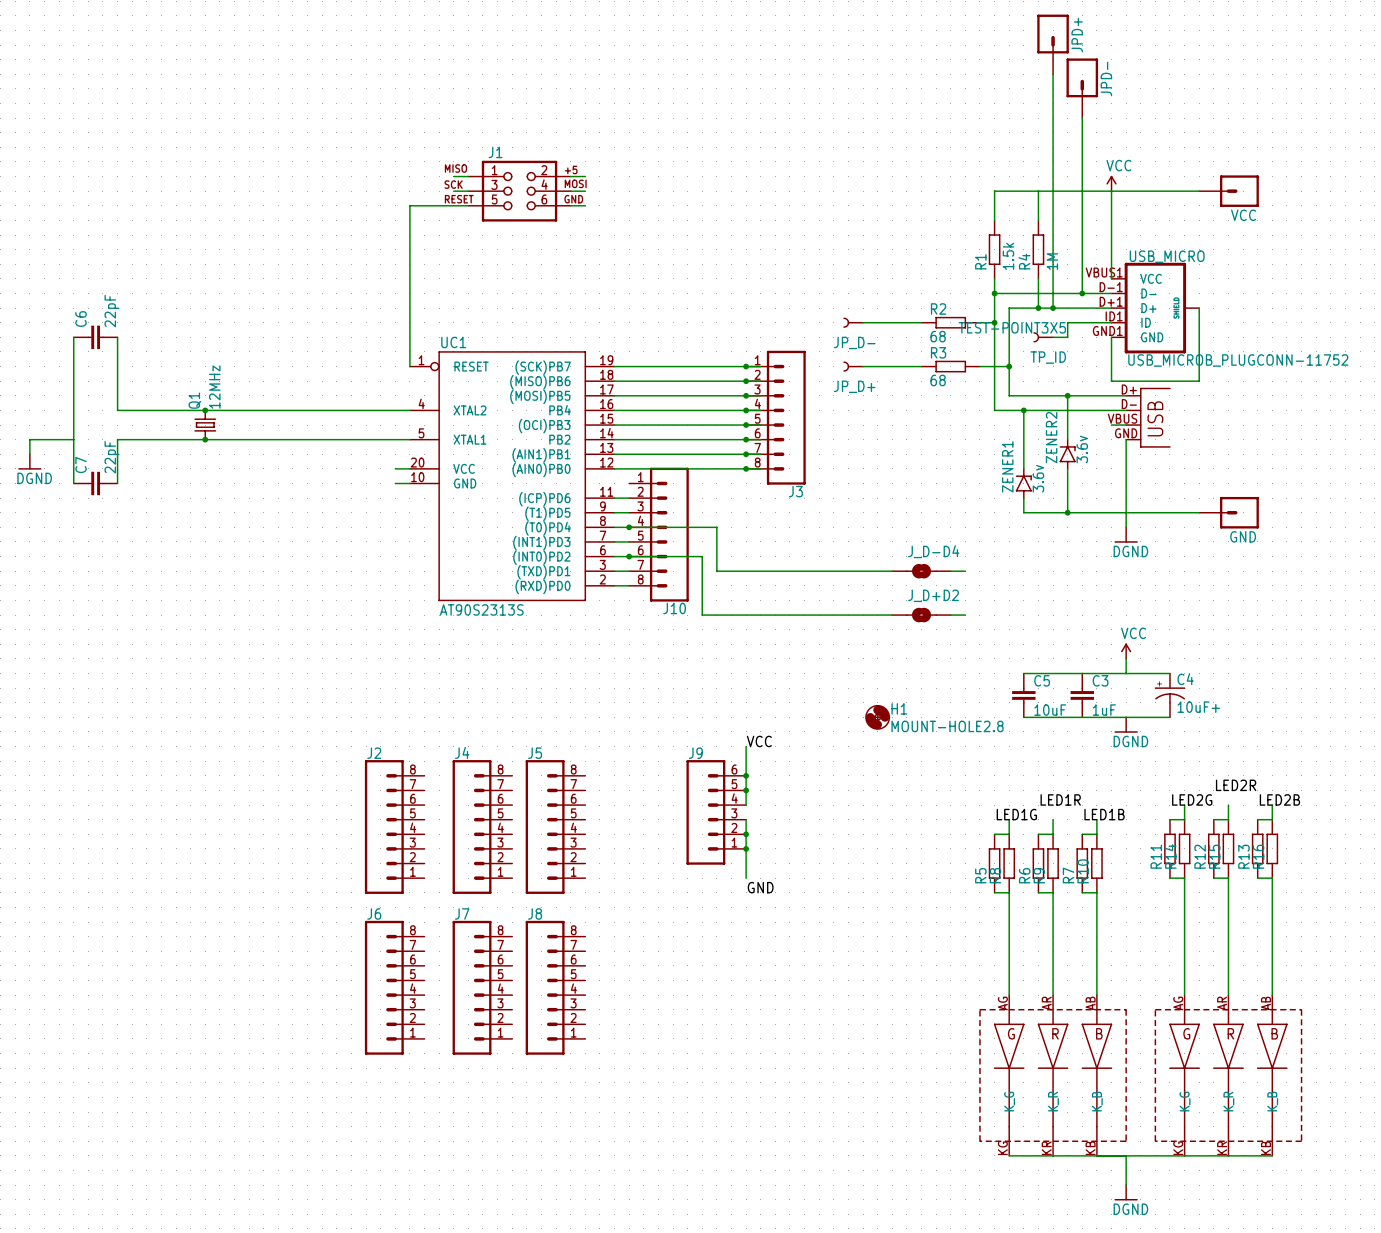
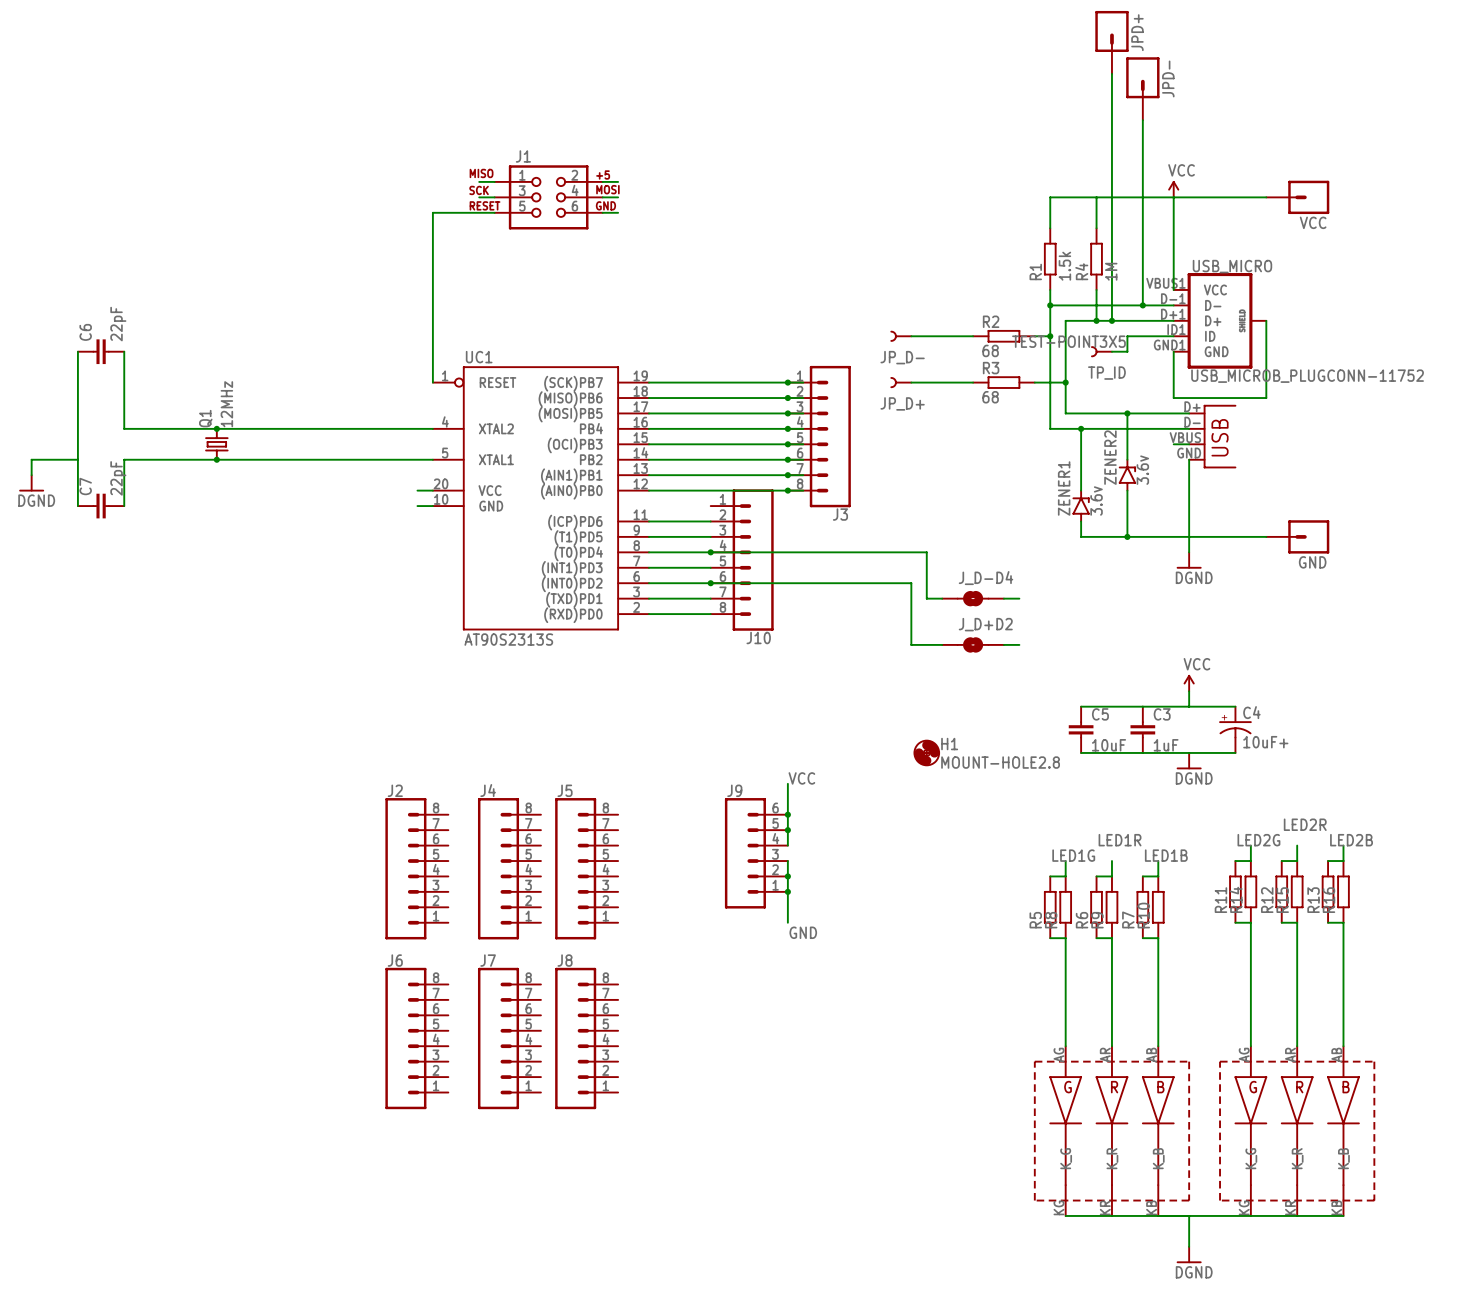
junction: (629, 527) -> none
junction: none -> (710, 552)
wire: (716, 527) (716, 571) (877, 571) -> (757, 552) (926, 552) (926, 598)
J10 position: (658, 534) -> (742, 560)
junction: (629, 556) -> none
junction: none -> (710, 583)
wire: (702, 556) (702, 615) (863, 615) -> (741, 583) (911, 583) (911, 644)

